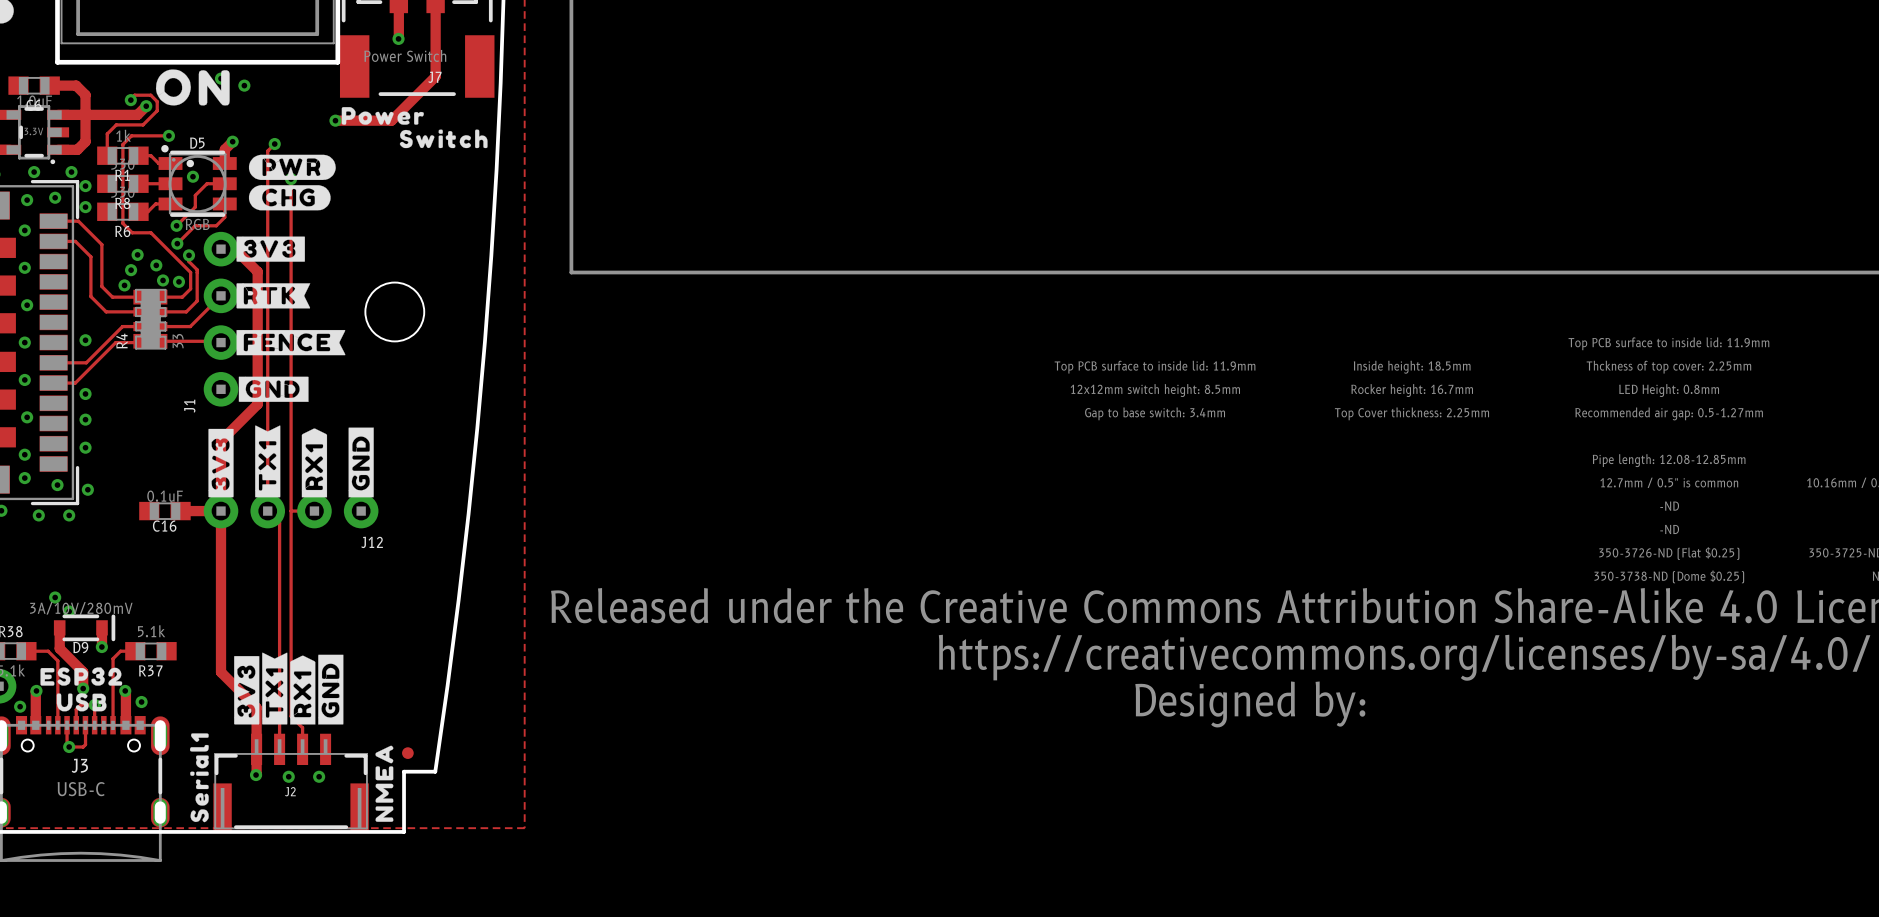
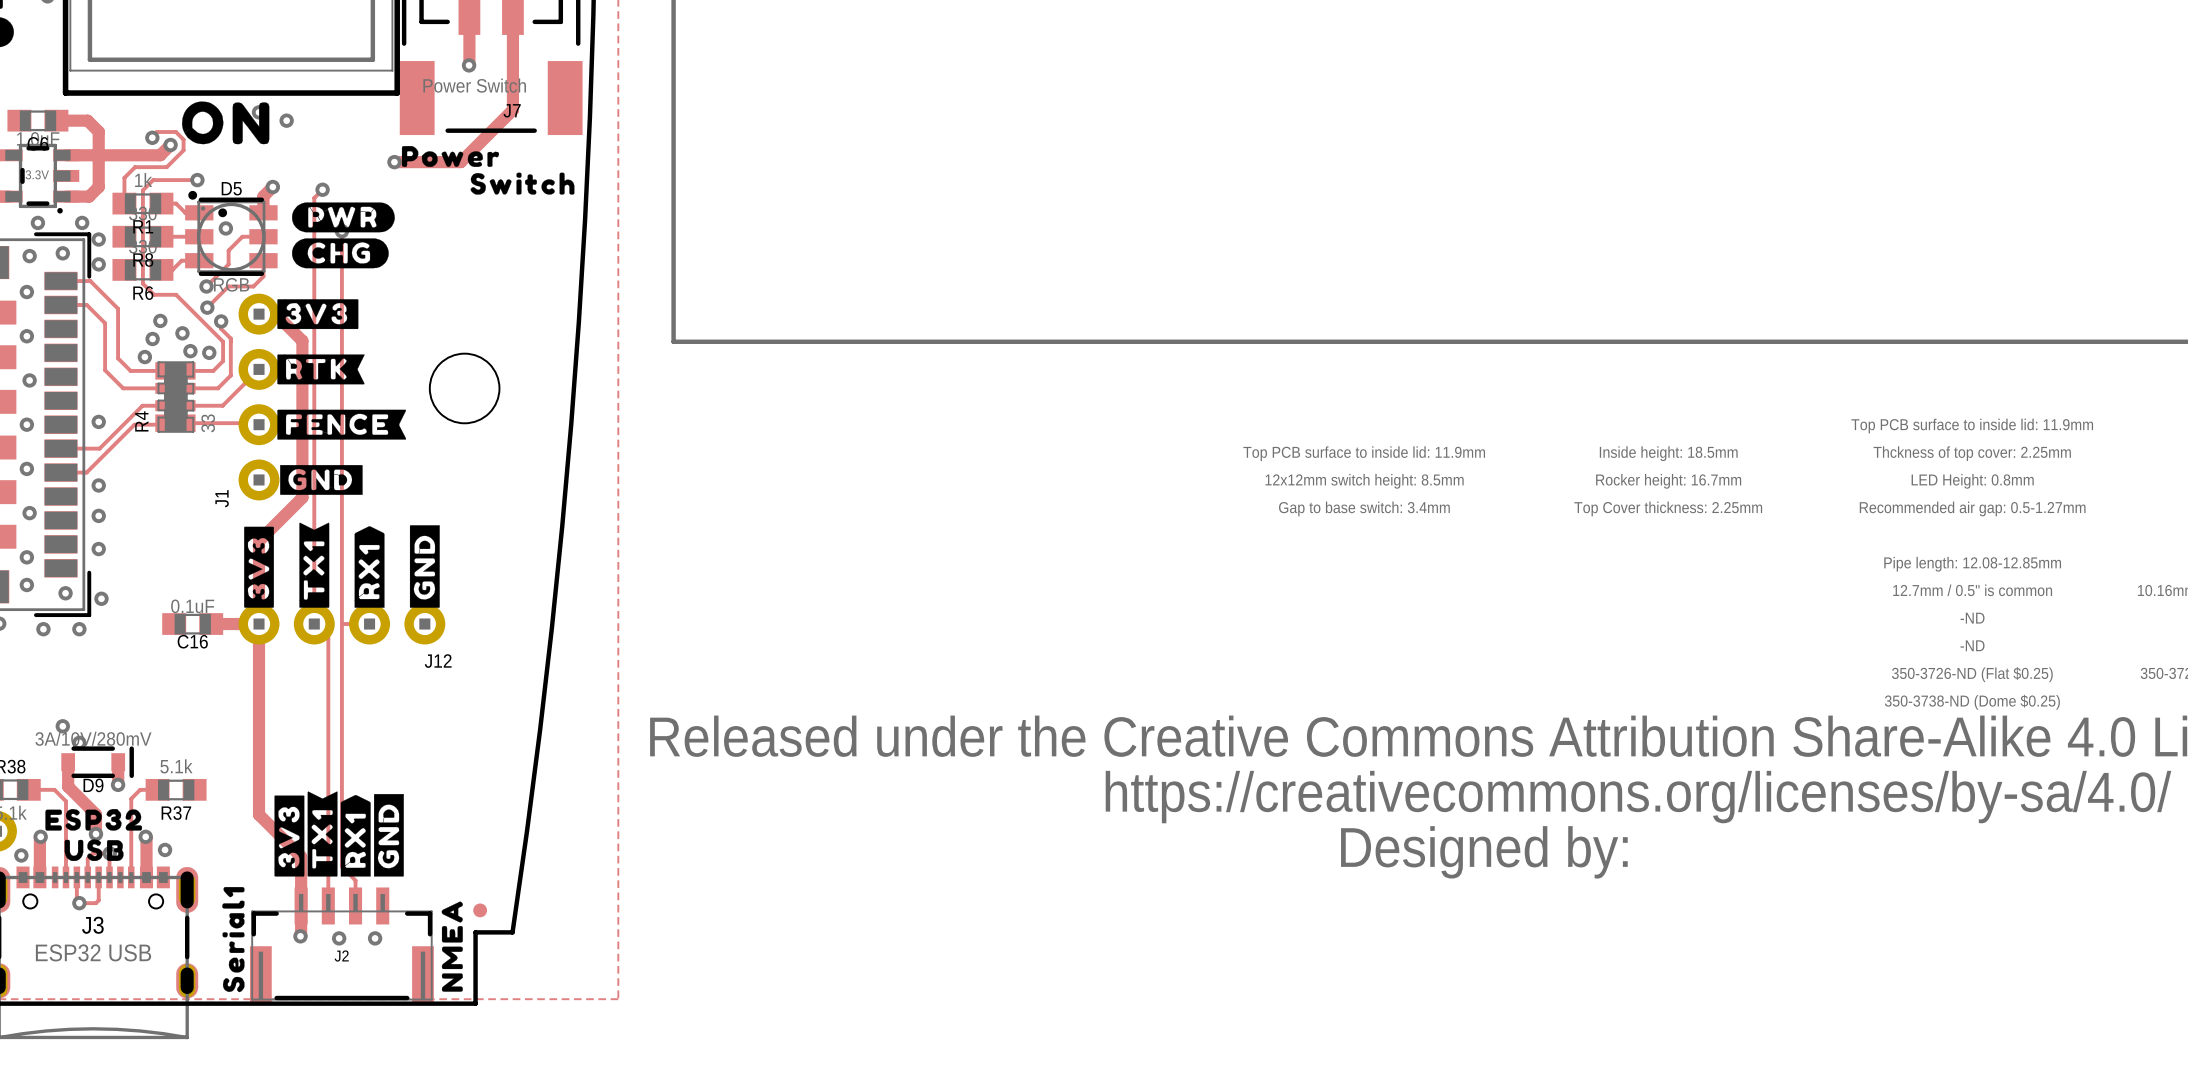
J3 value: USB-C (81, 789) -> ESP32 USB (93, 952)

